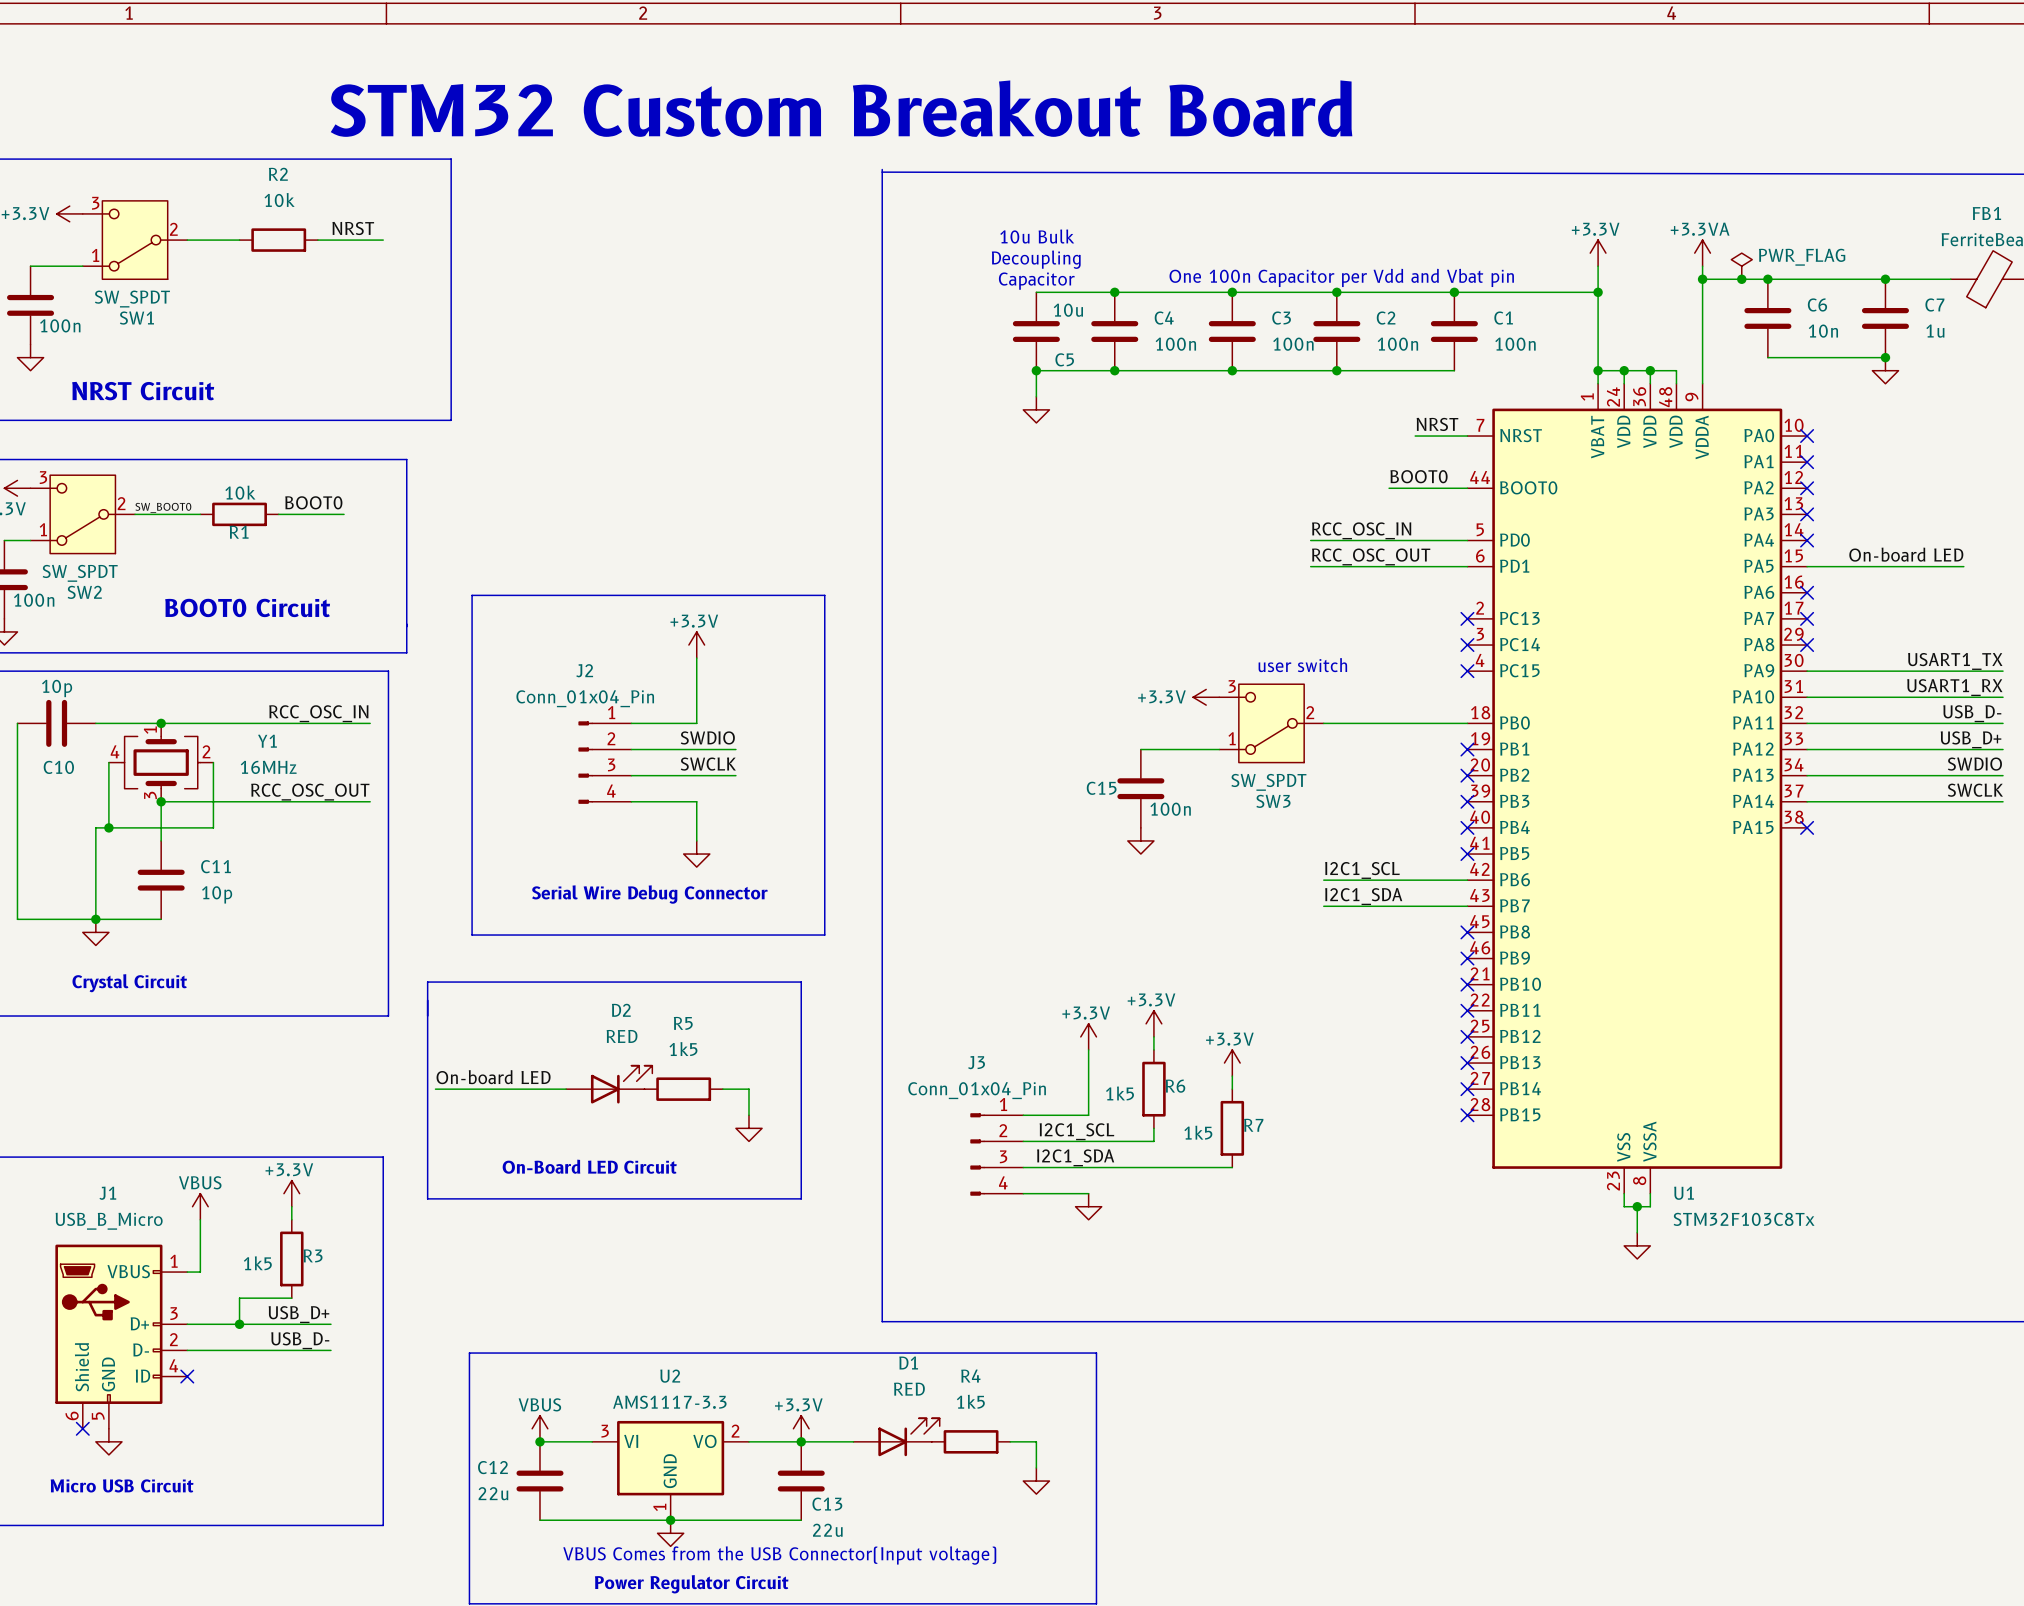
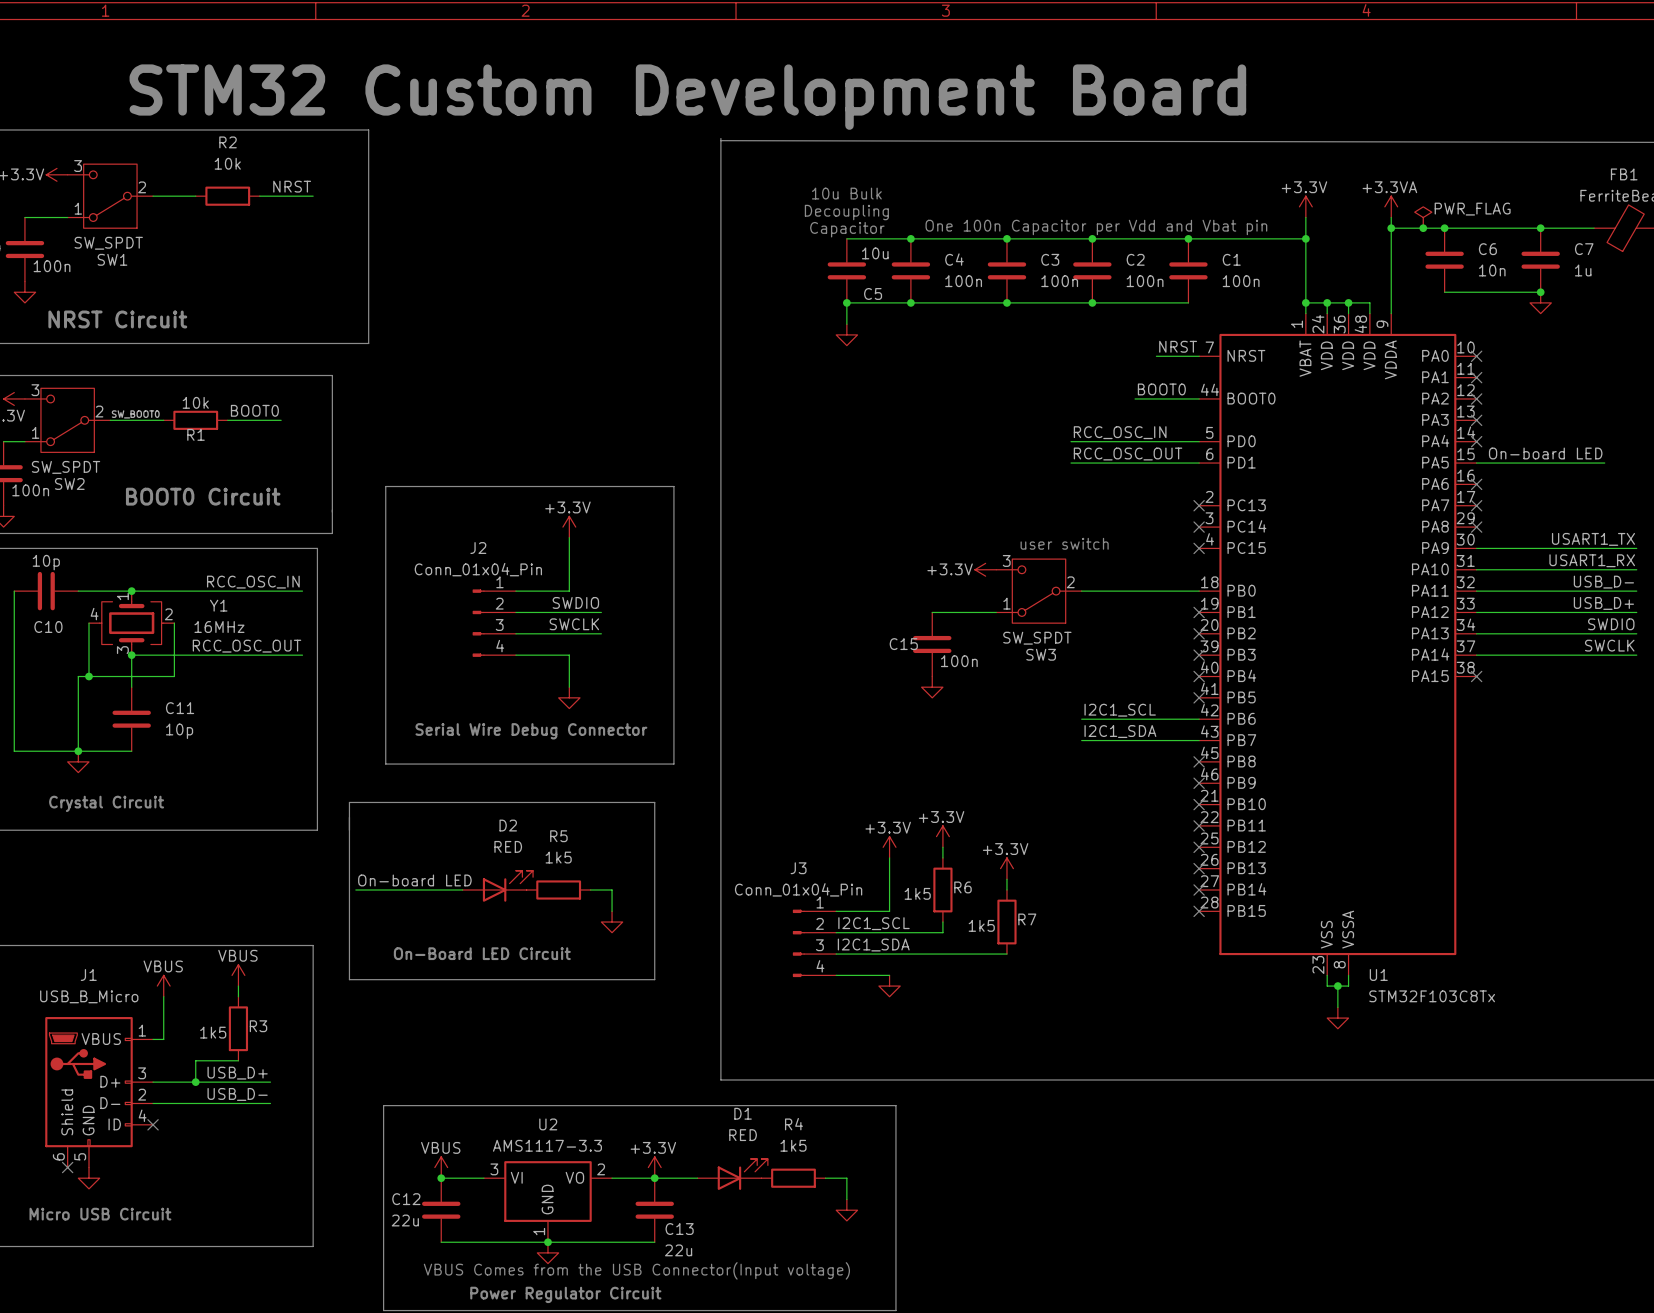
text: STM32 Custom Breakout Board (841, 108) -> STM32 Custom Development Board (687, 97)
power symbol: +3.3V (291, 1193) -> VBUS (238, 975)

